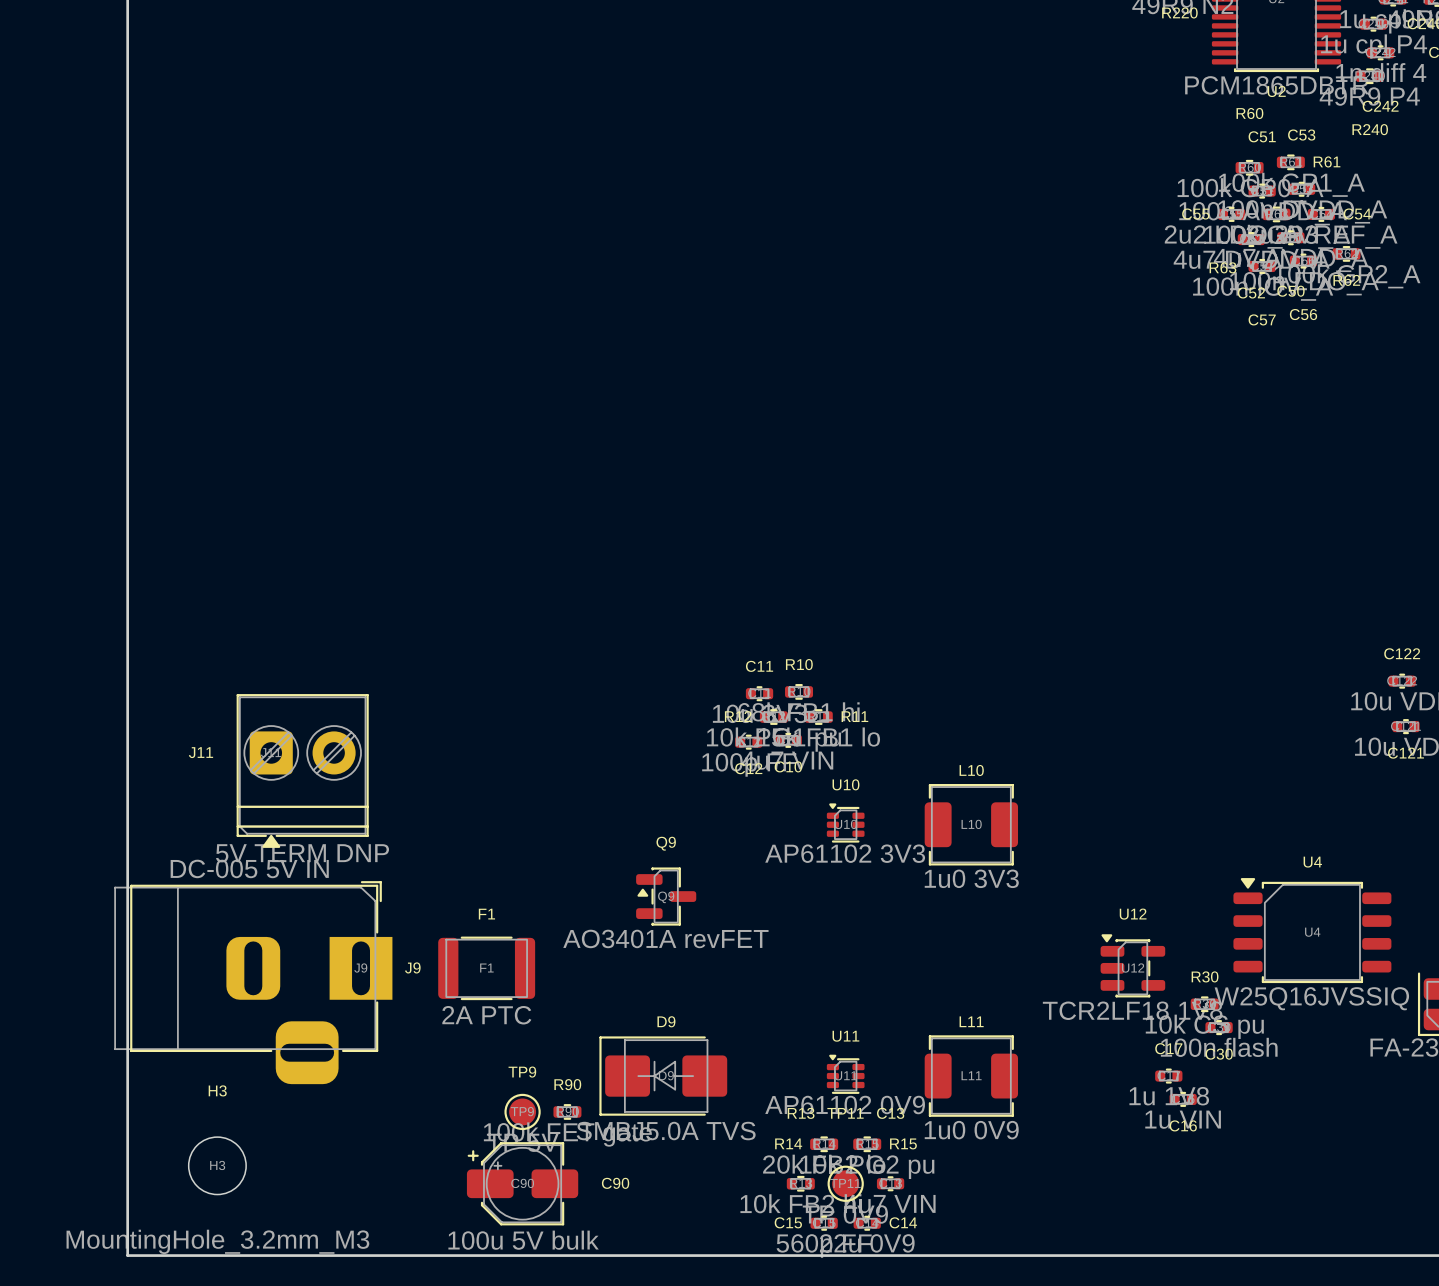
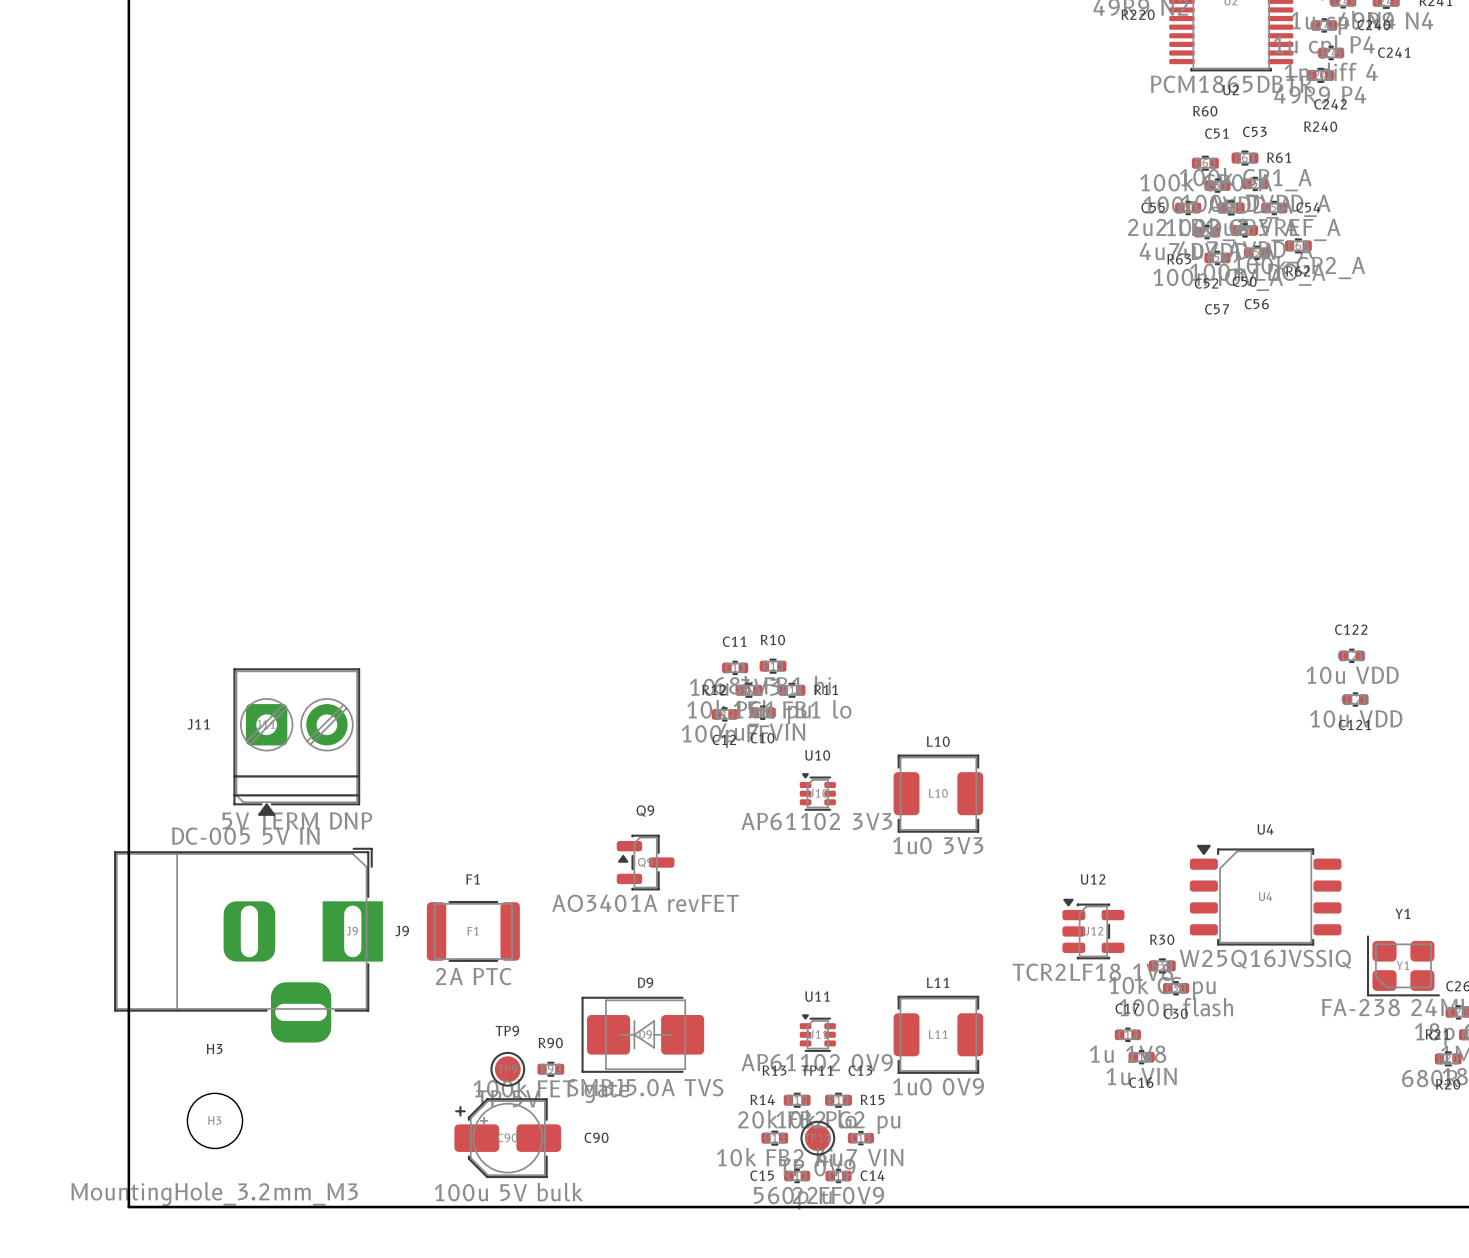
J9 footprint: [114, 881, 393, 1085] -> [114, 847, 383, 1043]

